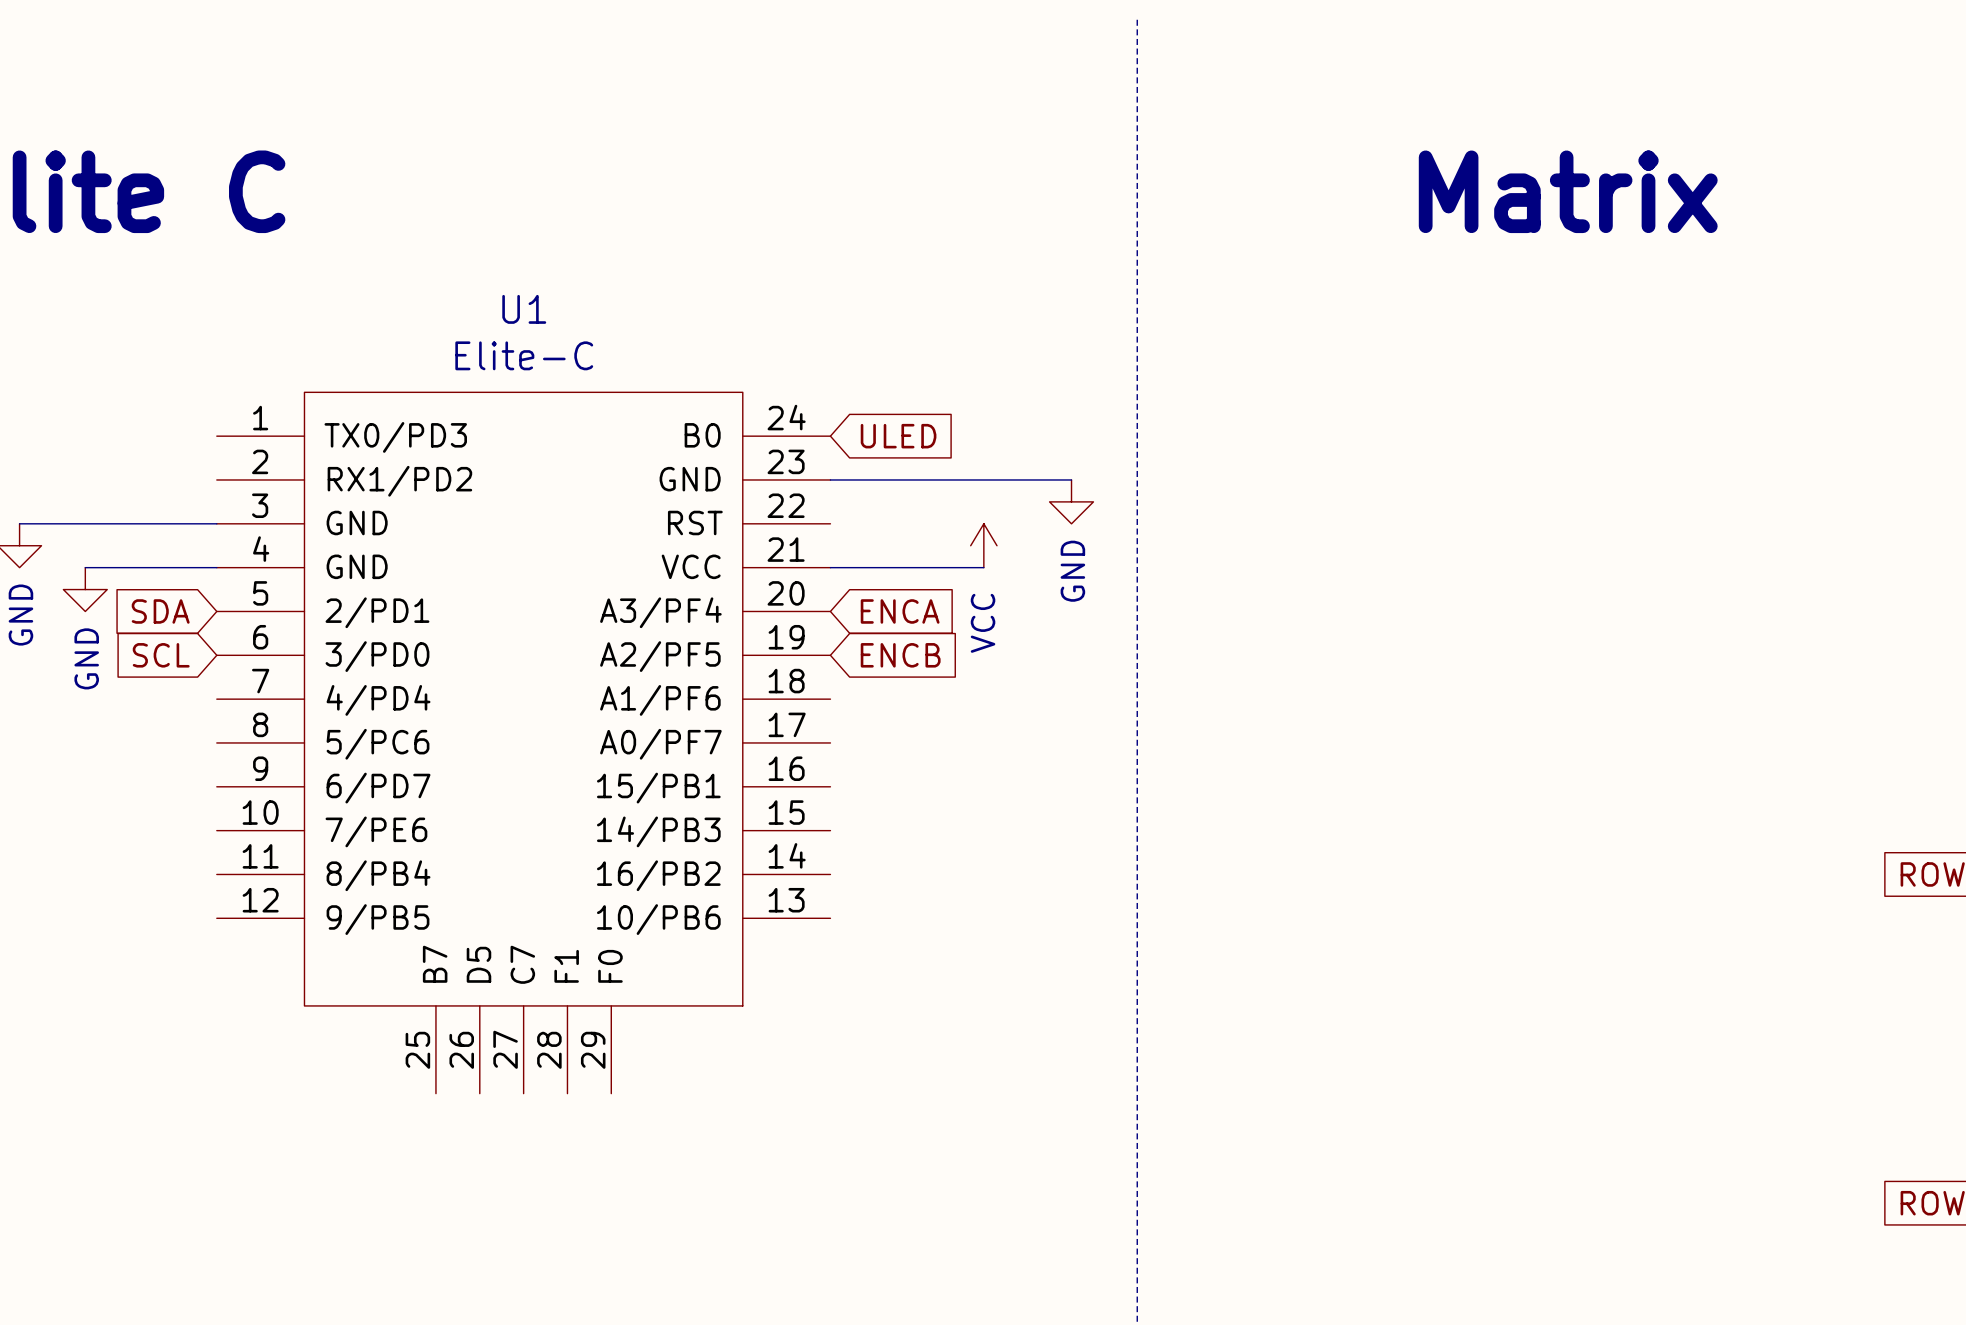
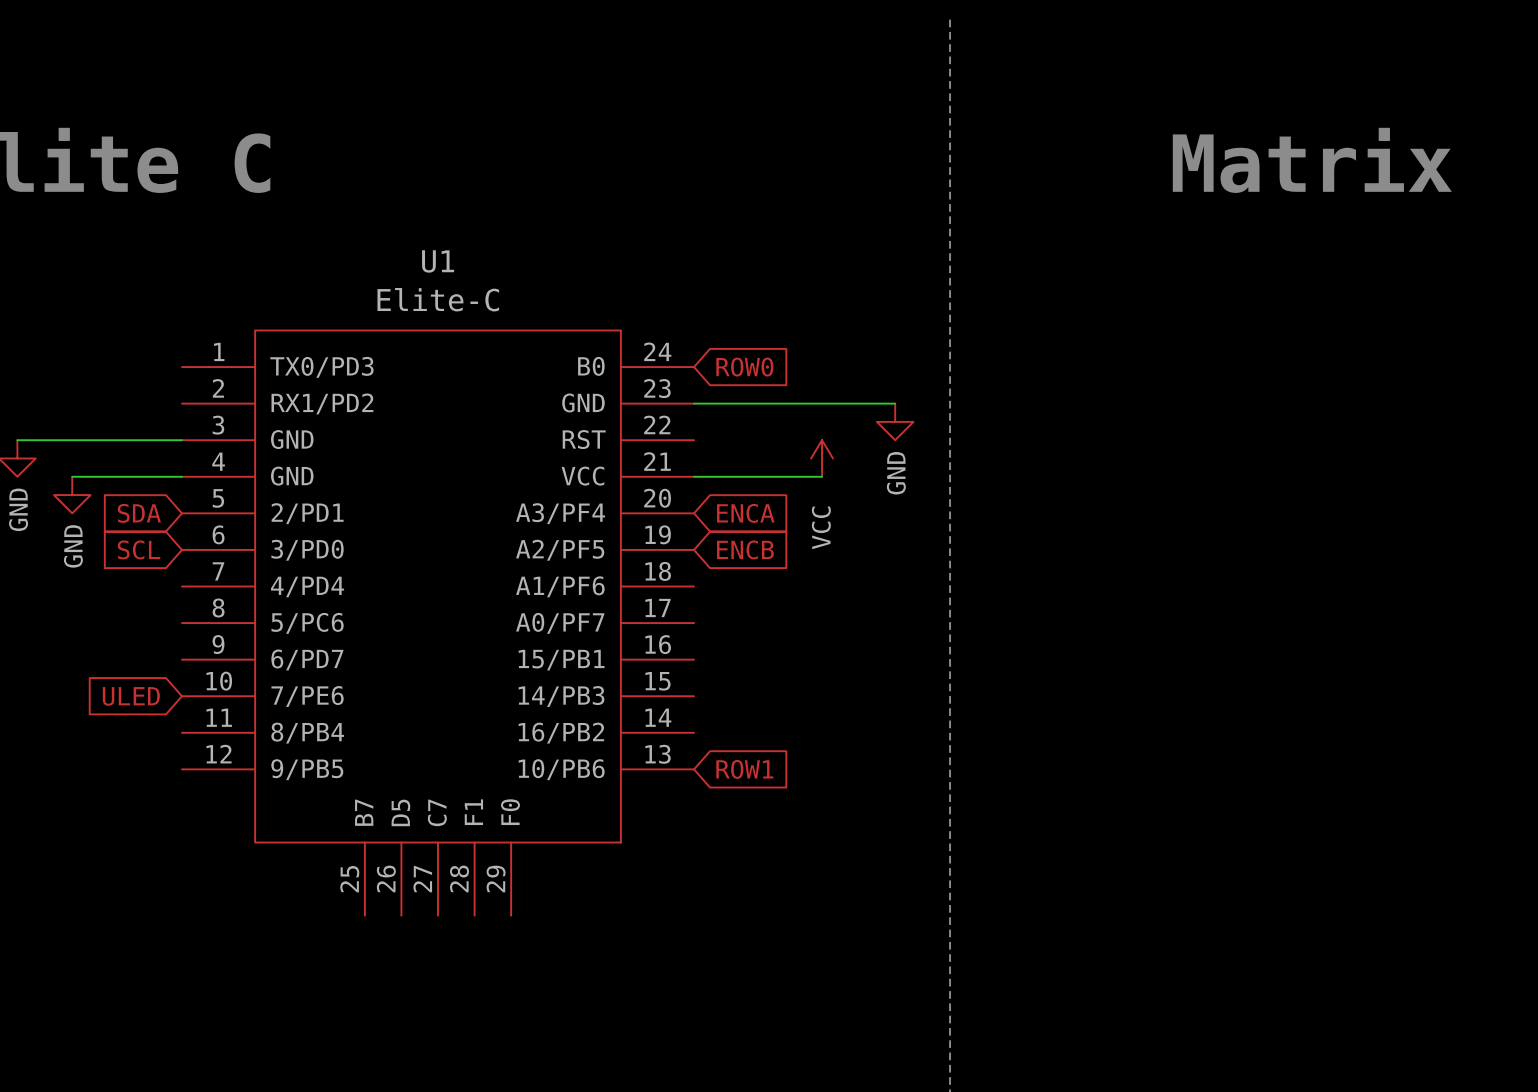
global label: ULED (898, 436) -> ROW0 (744, 367)
global label: none -> ULED (131, 696)
global label: none -> ROW1 (744, 769)

